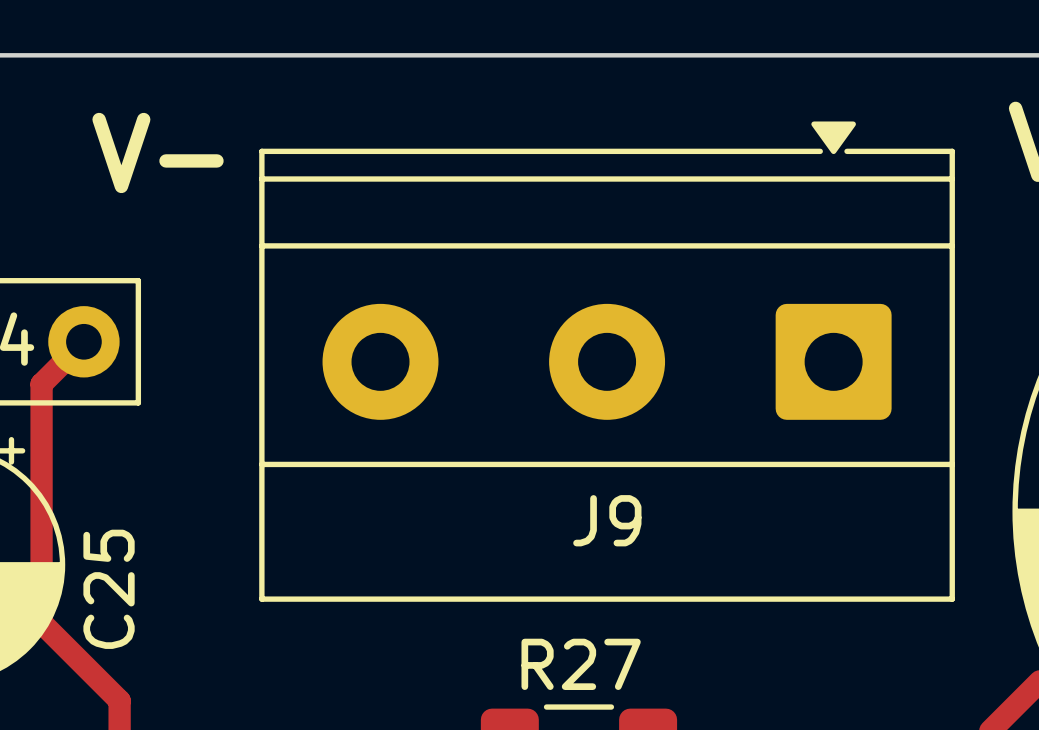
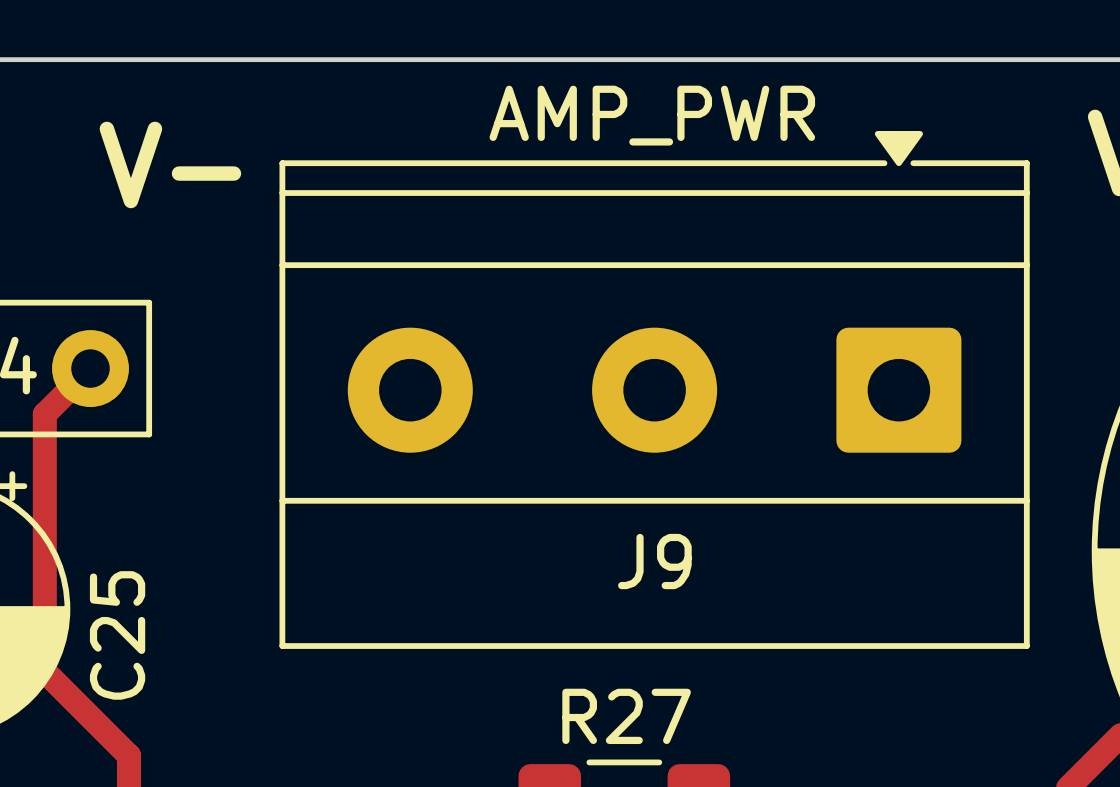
J9 value: none -> AMP_PWR (652, 115)

